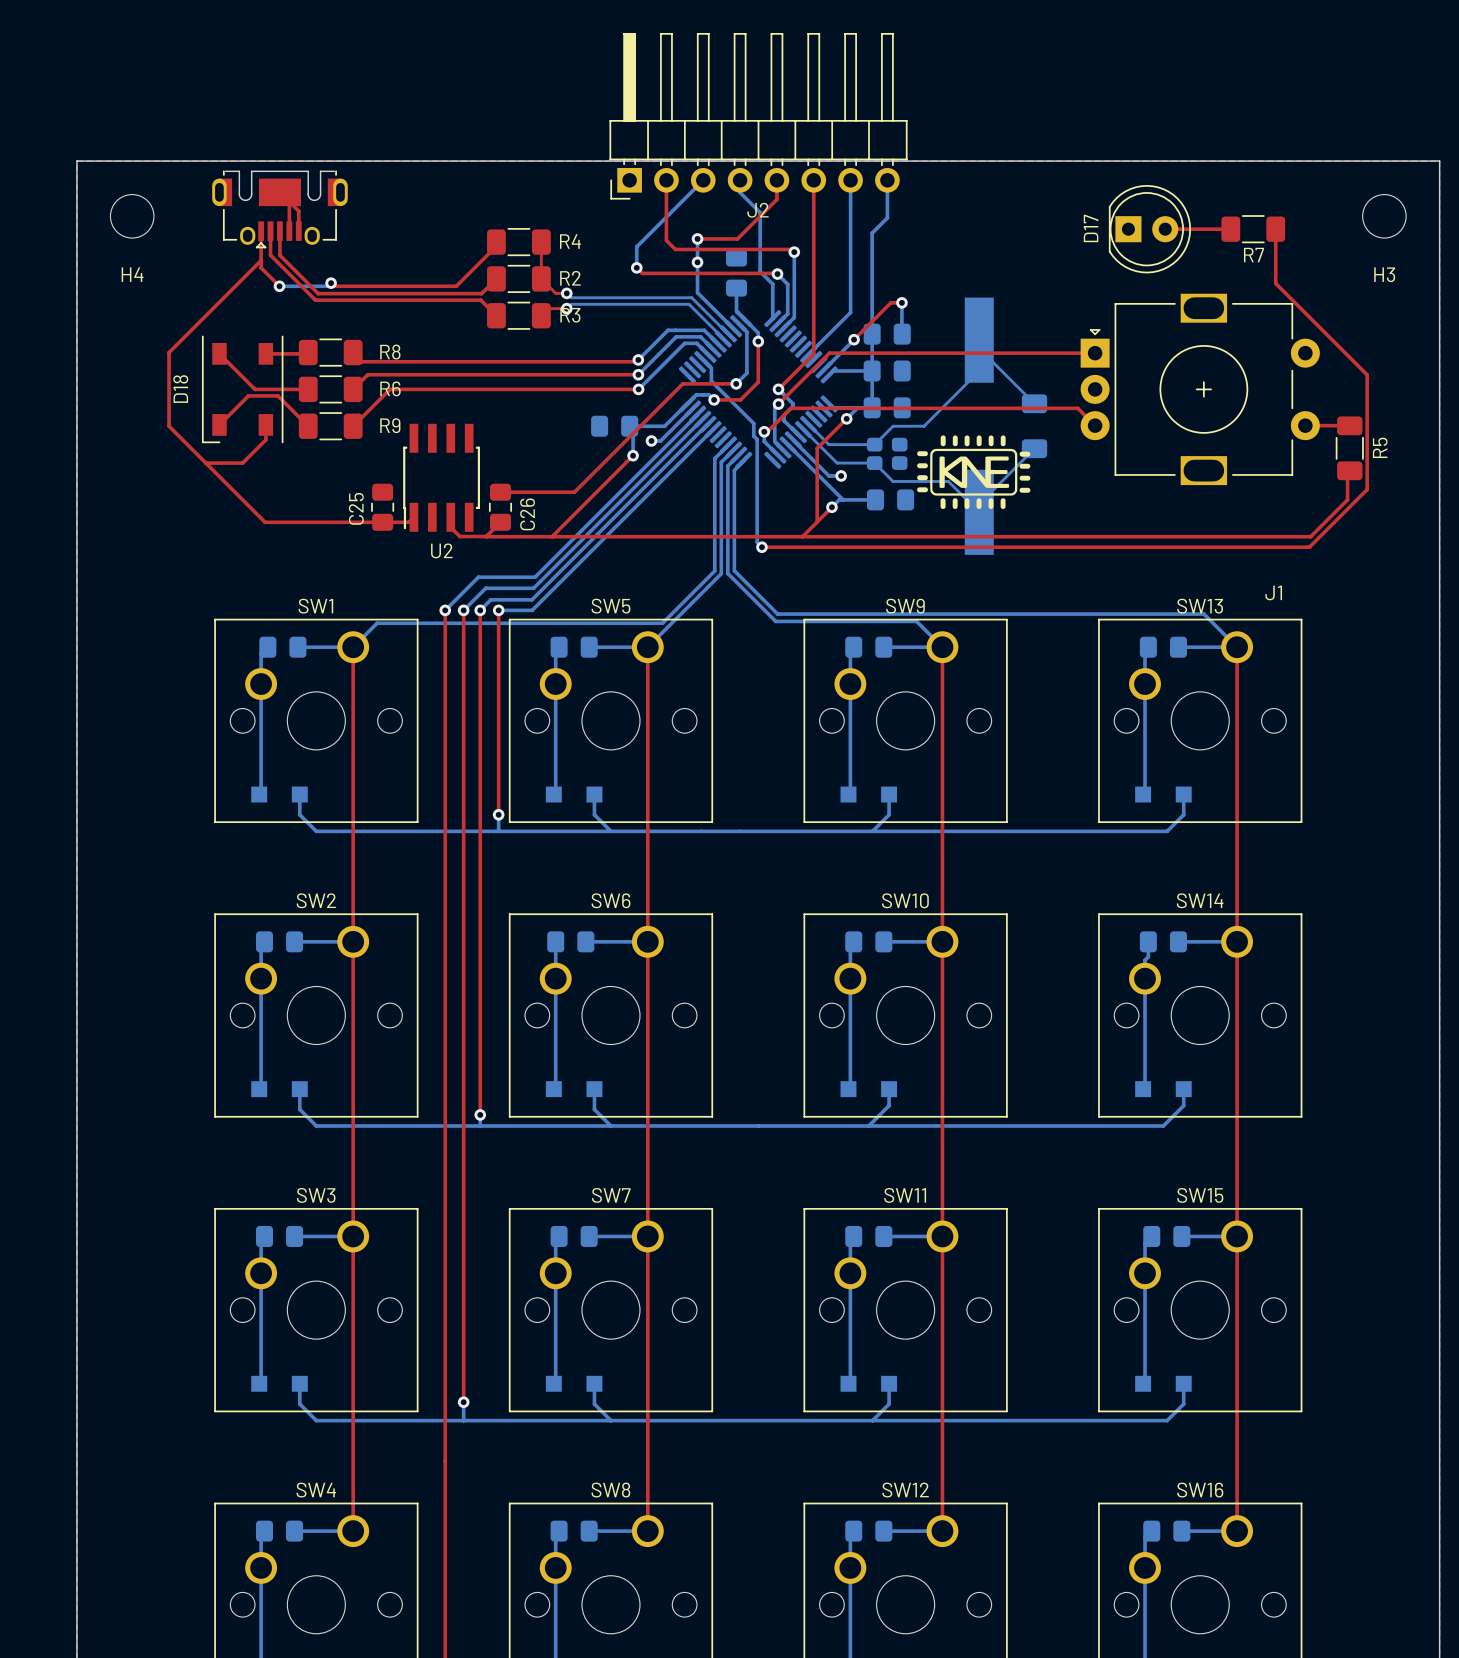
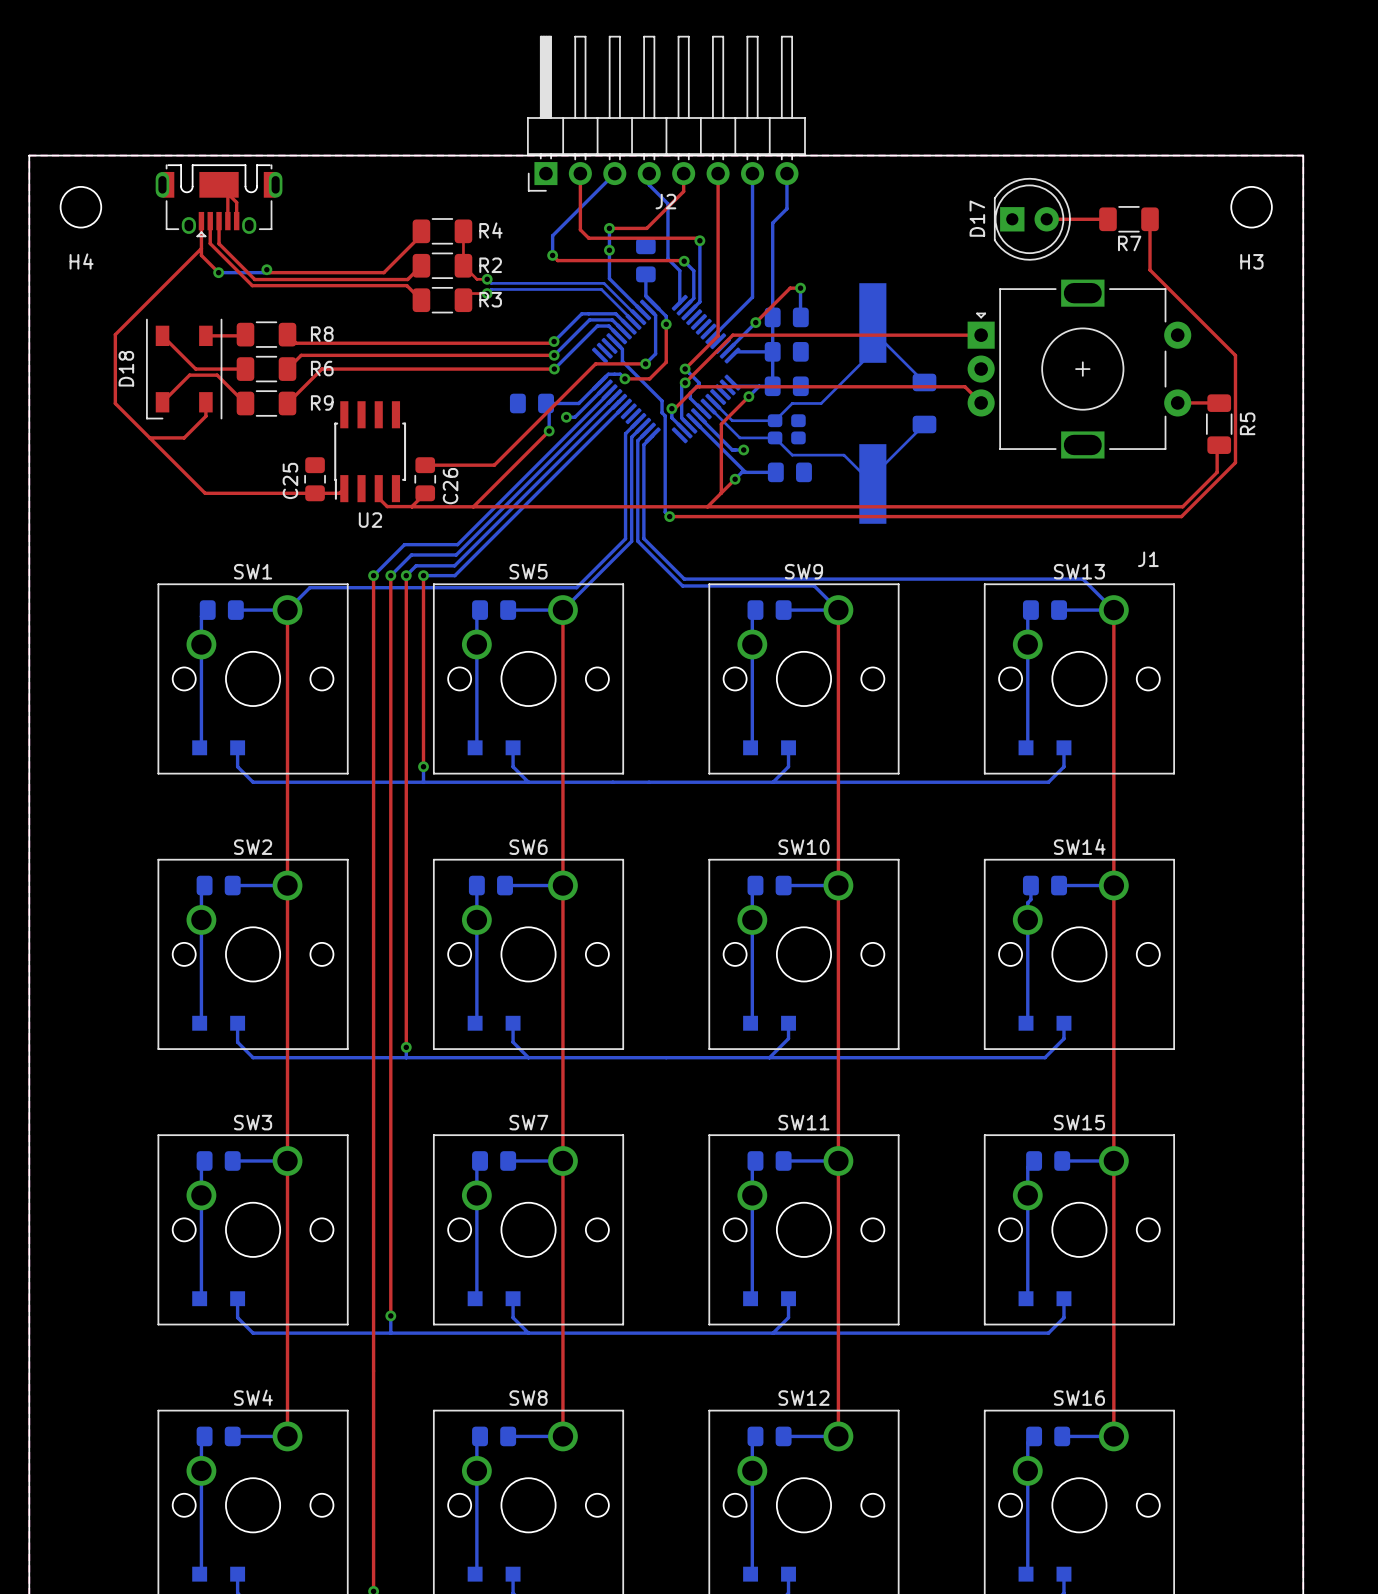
drawing: [917, 435, 1031, 510] -> none

